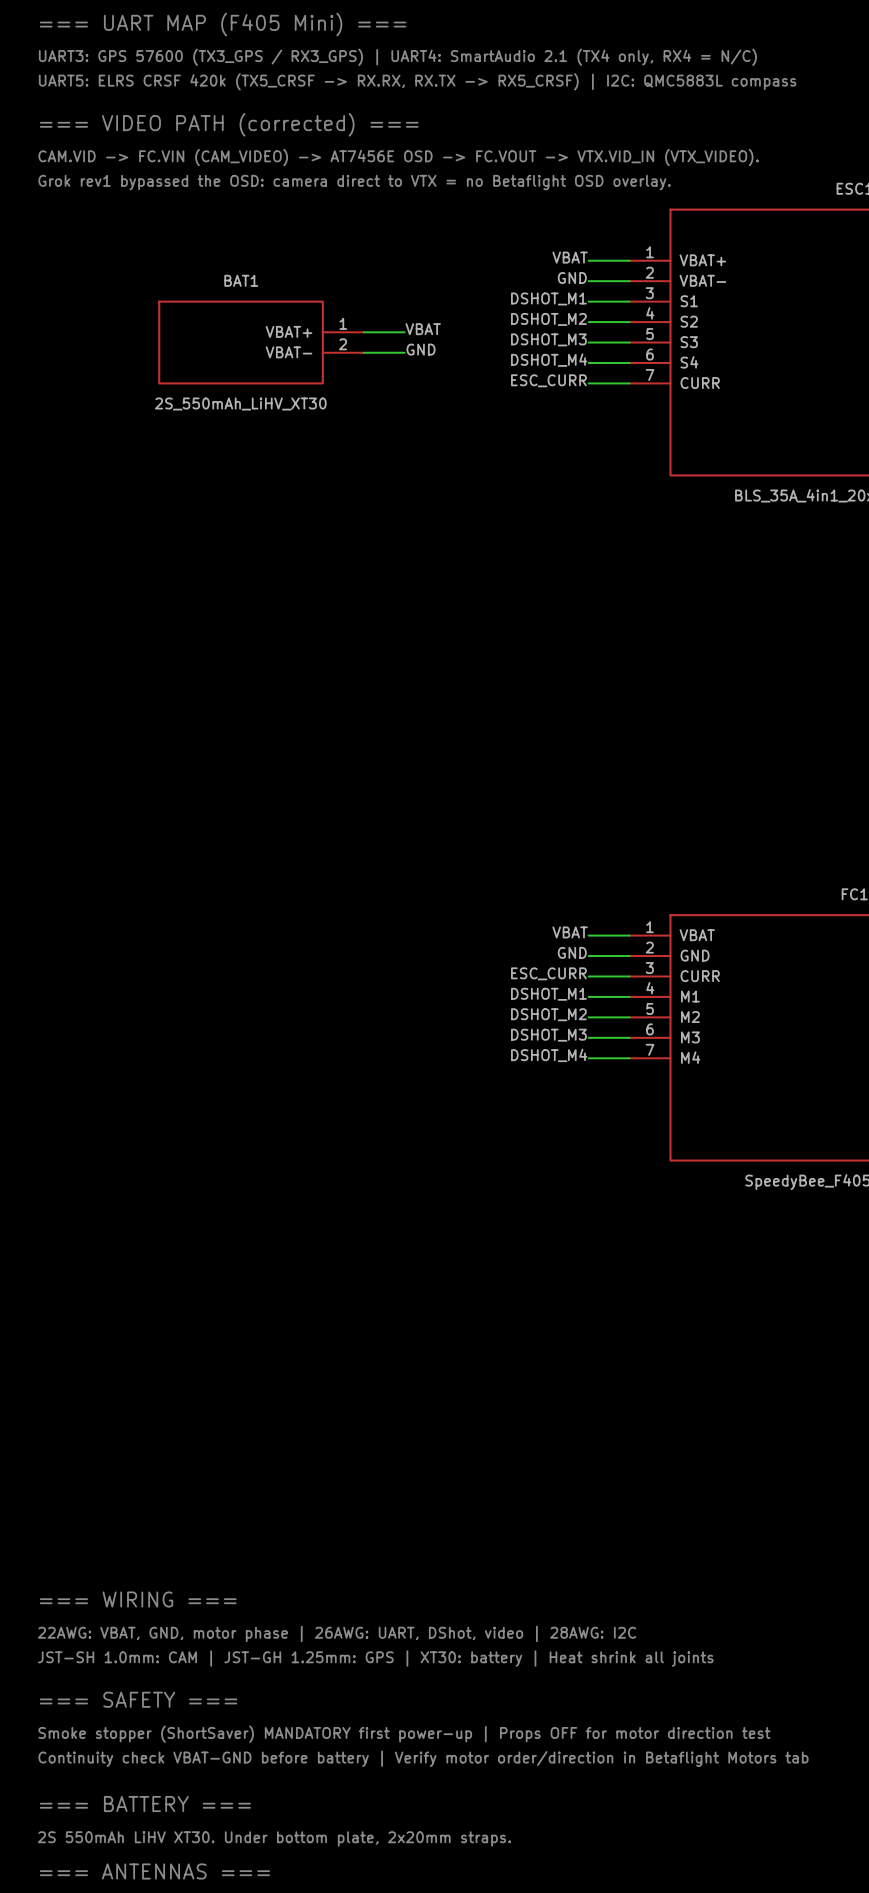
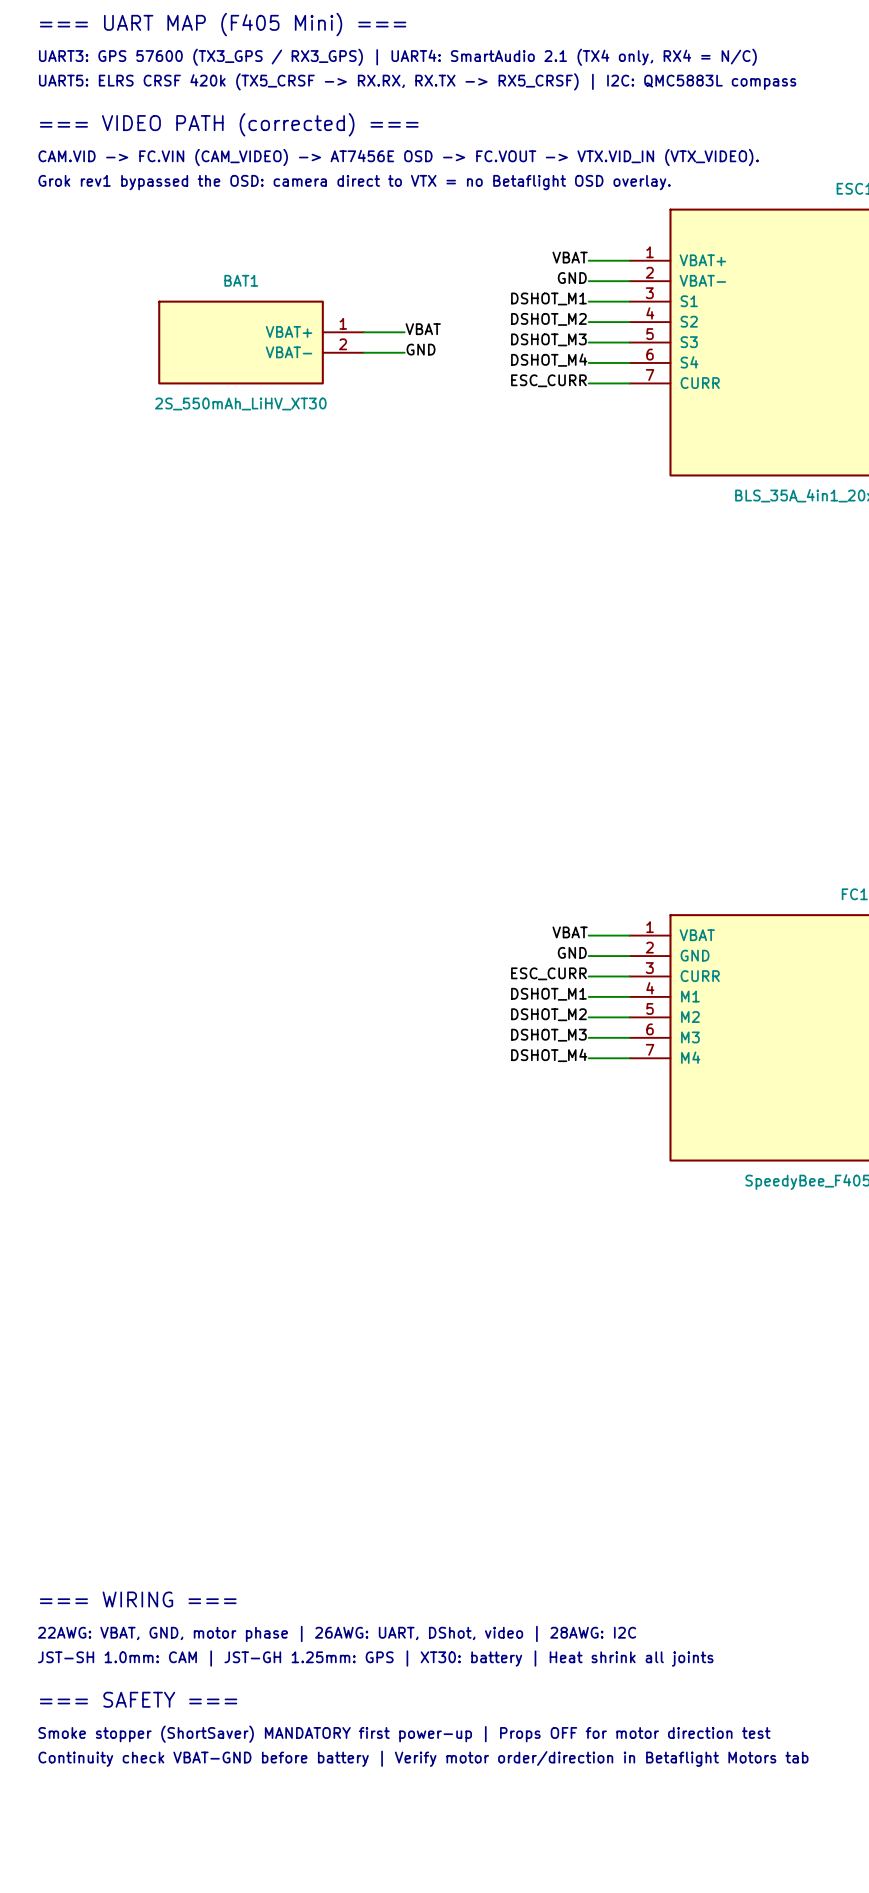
text: === BATTERY === (145, 1804) -> none
text: 2S 550mAh LiHV XT30. Under bottom plate, 2x20mm straps. (274, 1838) -> none
text: === ANTENNAS === (154, 1871) -> none

